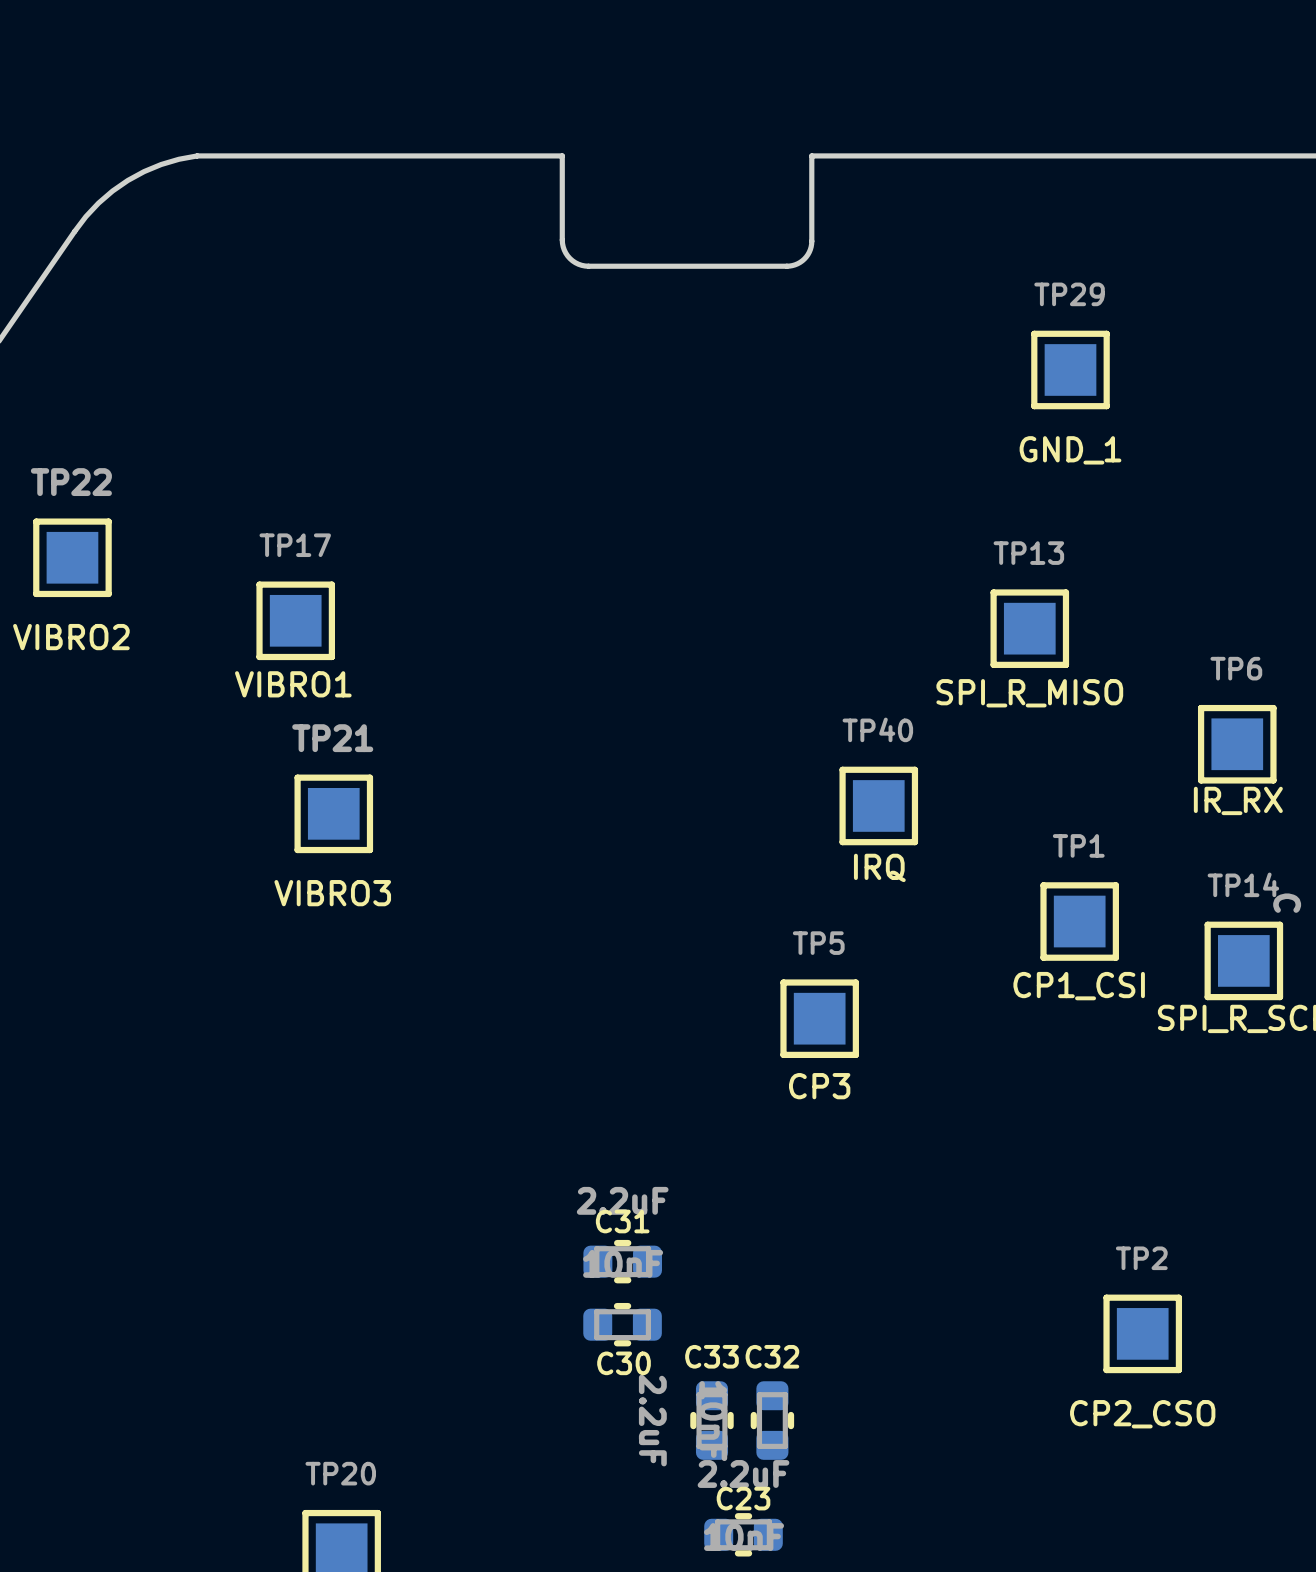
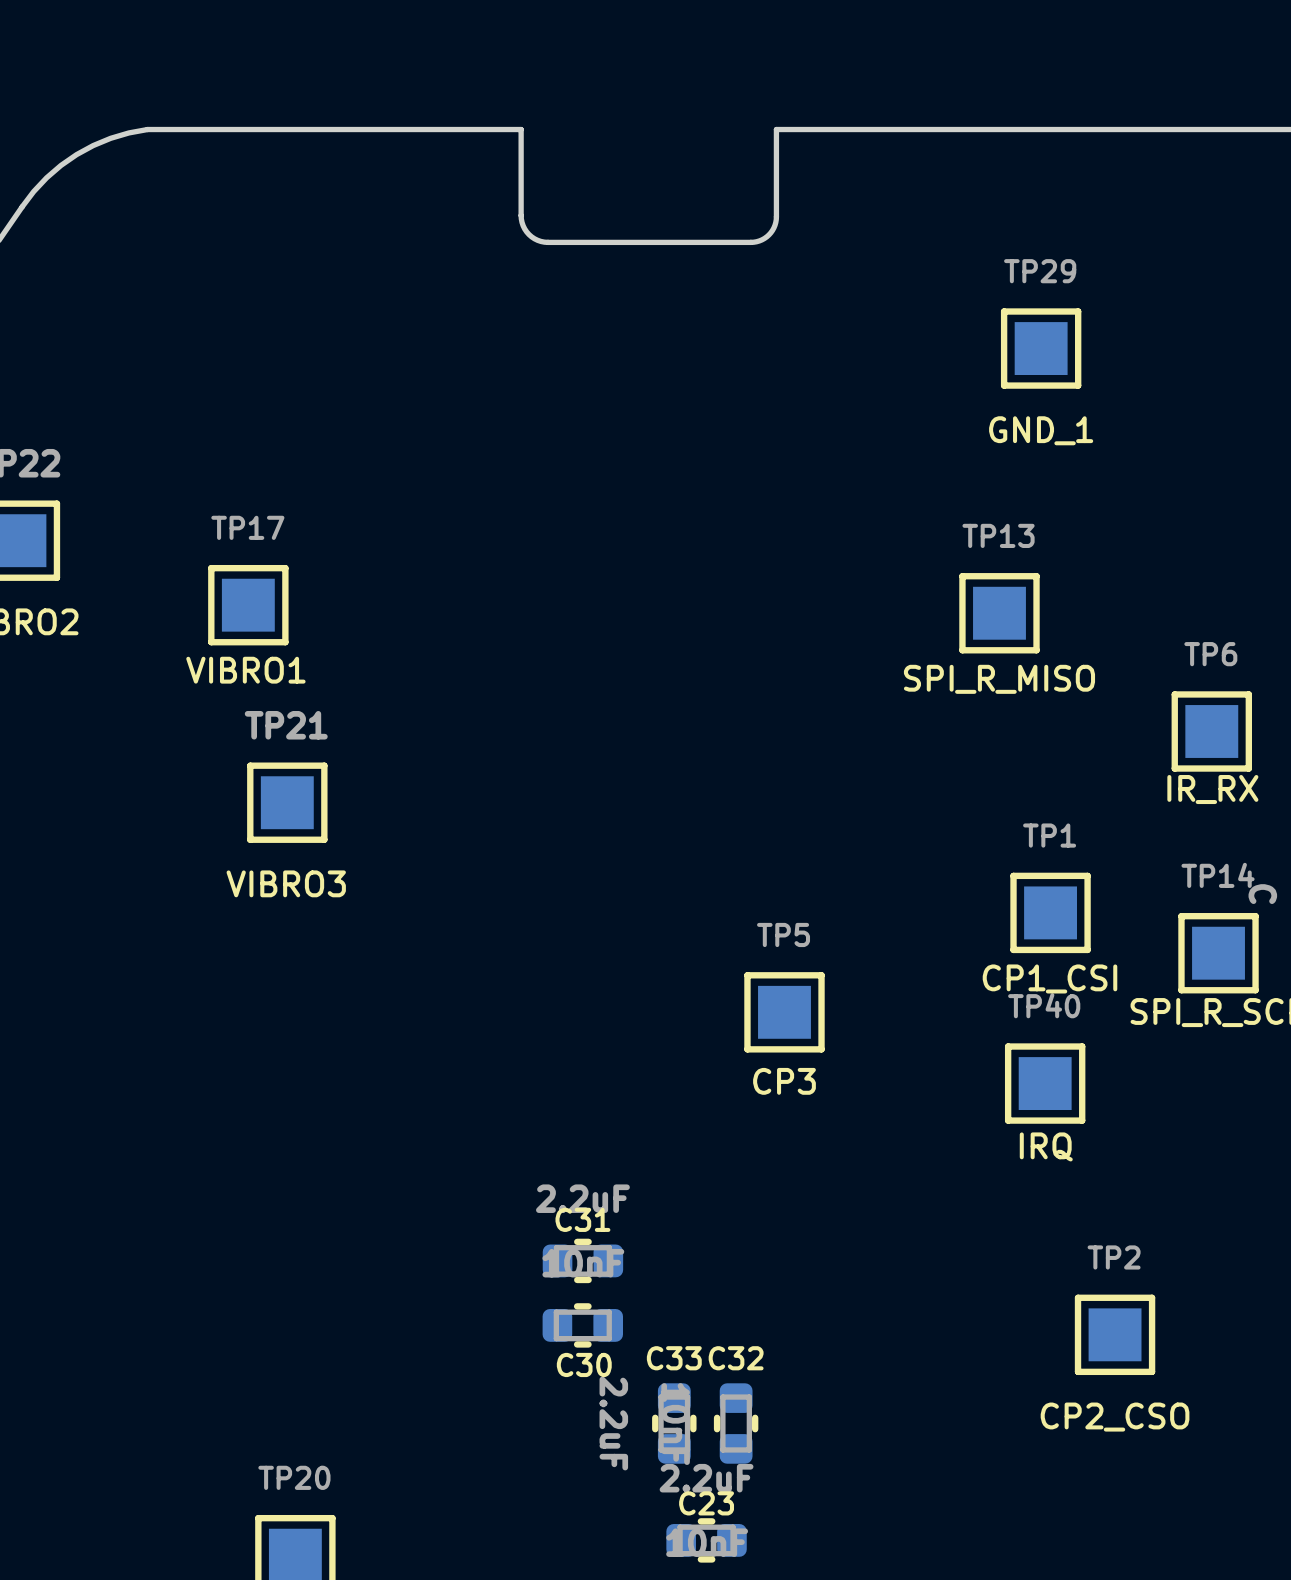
TP40 position: (878, 805) -> (1045, 1083)

